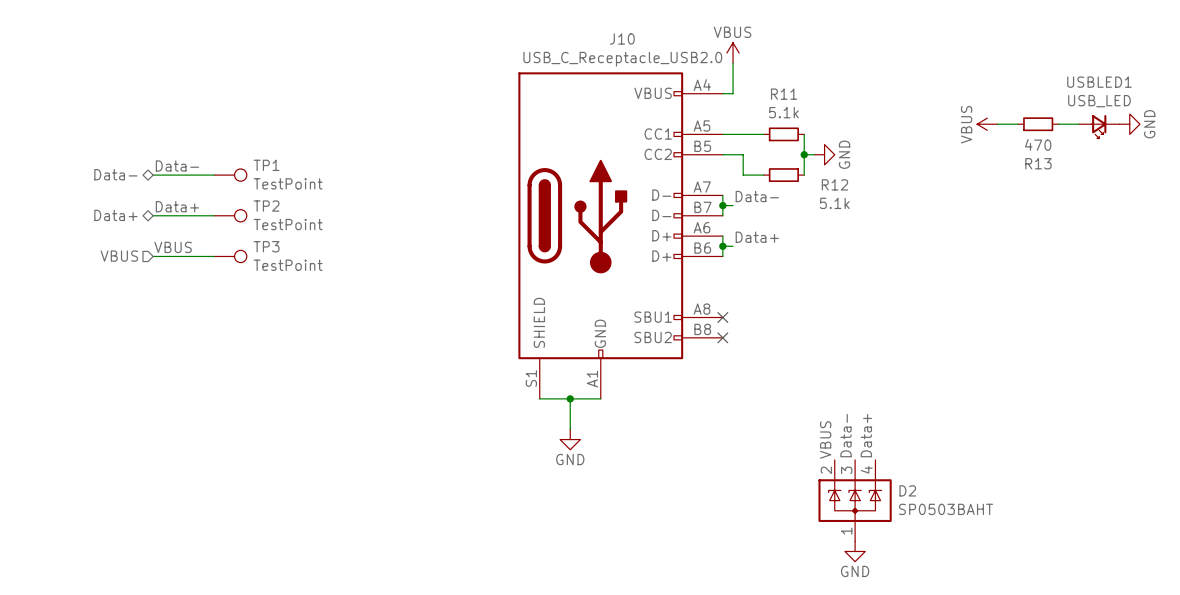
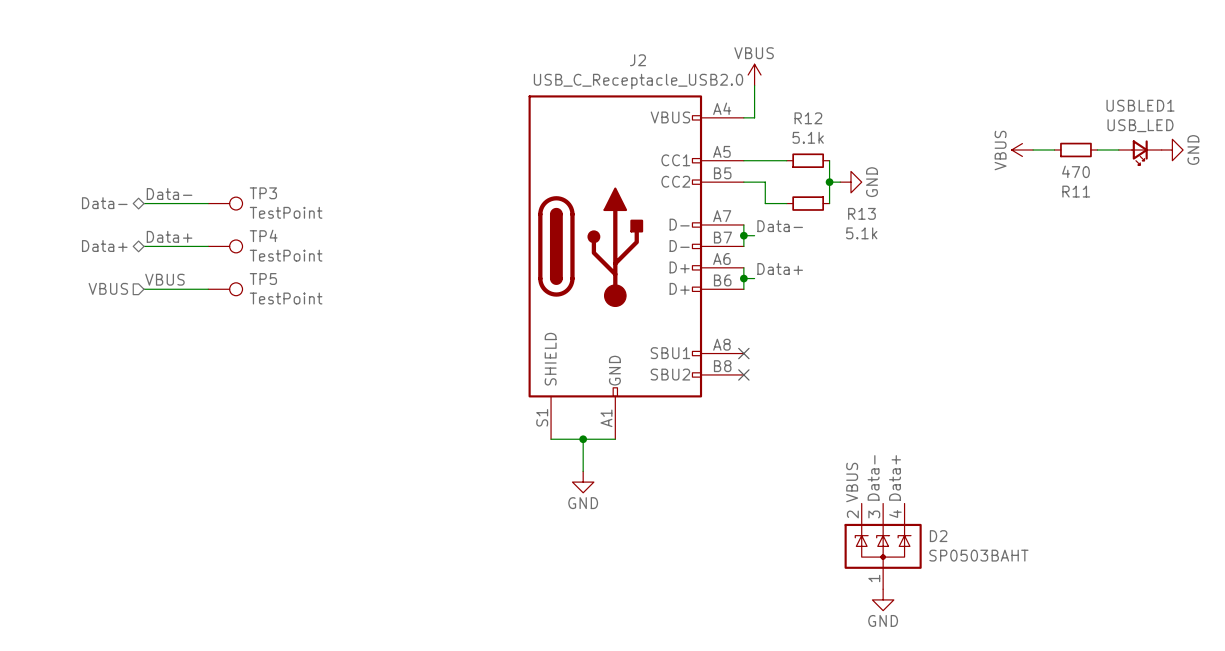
J10 name: J10 (622, 39) -> J2 (637, 60)
R11 name: R11 (784, 94) -> R12 (808, 118)
R13 name: R13 (1038, 163) -> R11 (1076, 191)
TP1 name: TP1 (266, 165) -> TP3 (263, 193)
R12 name: R12 (834, 184) -> R13 (861, 213)
TP2 name: TP2 (266, 206) -> TP4 (263, 235)
TP3 name: TP3 (266, 246) -> TP5 (263, 279)

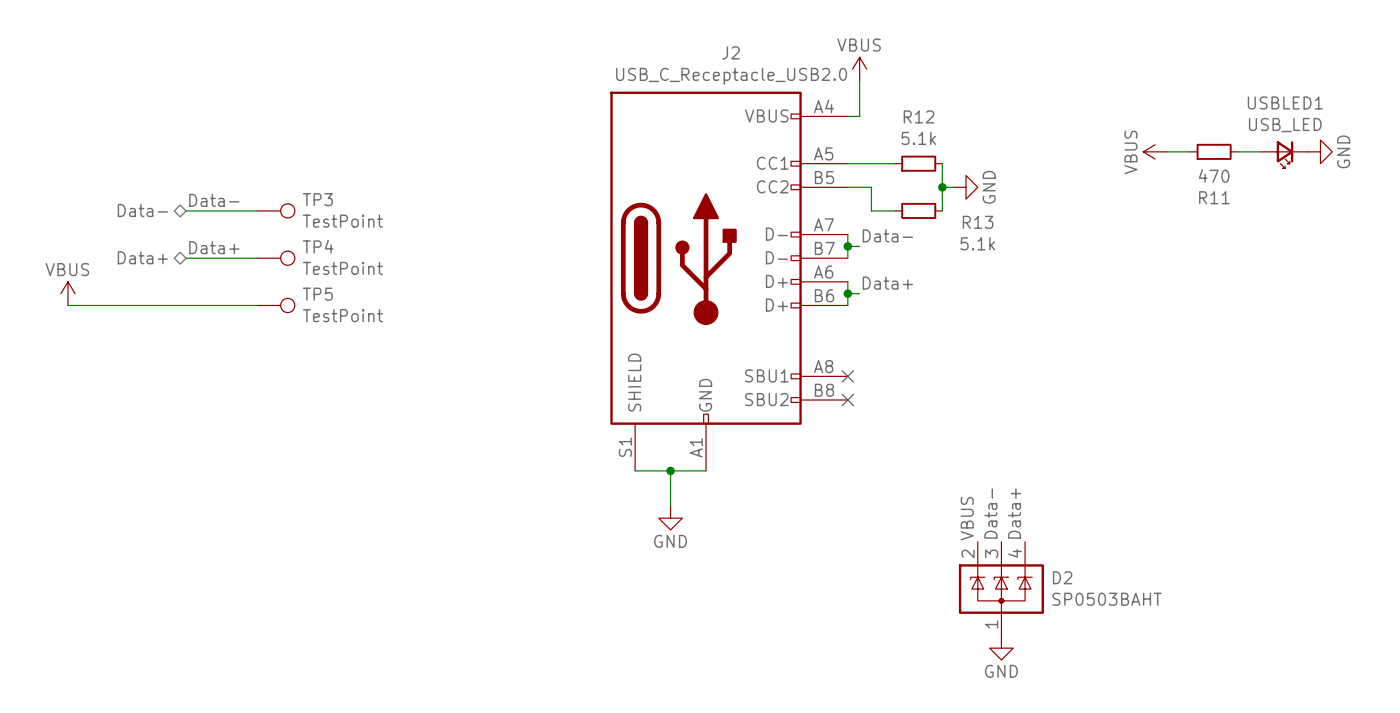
power symbol: none -> VBUS (67, 293)
label: VBUS (164, 279) -> none
hierarchical label: VBUS (108, 288) -> none
wire: none -> (67, 305) (186, 305)

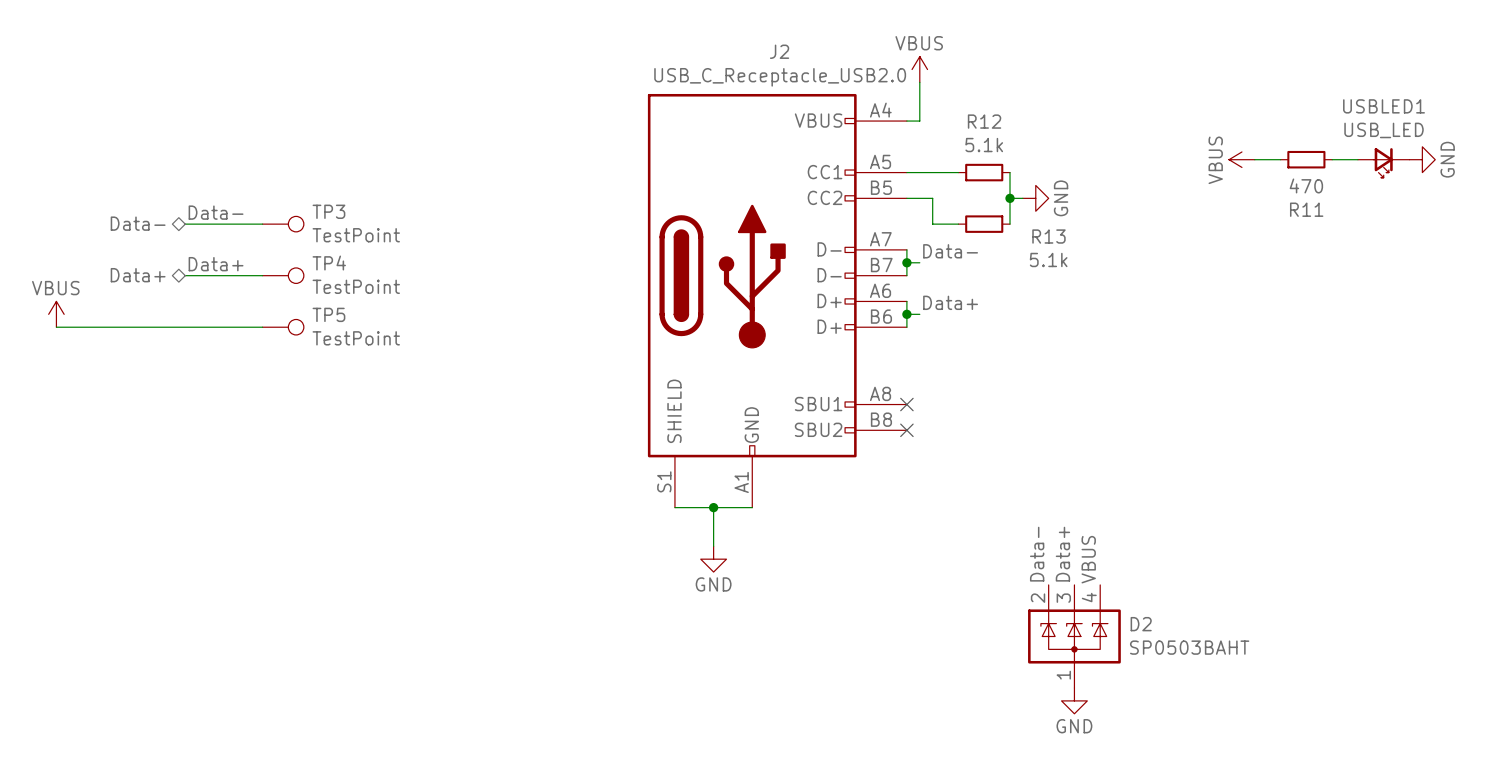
label: Data- (990, 513) -> Data+ (1062, 554)
label: Data+ (1014, 513) -> VBUS (1088, 559)
label: VBUS (967, 518) -> Data- (1037, 554)

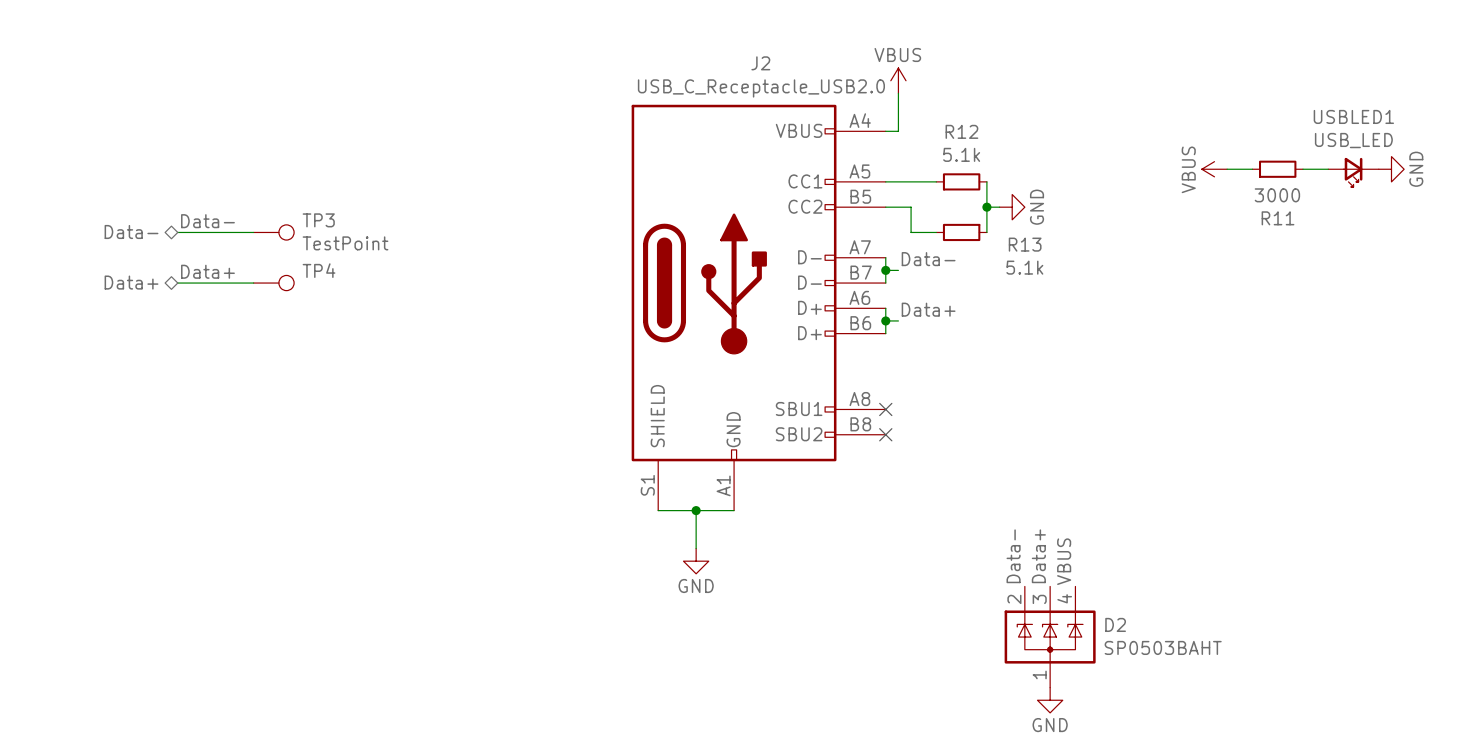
R11 value: 470 (1306, 185) -> 3000 (1277, 195)
TP4 value: TestPoint (356, 286) -> none
power symbol: VBUS (56, 314) -> none
wire: (56, 327) (262, 327) -> none
TP5: TestPoint (283, 327) -> none

